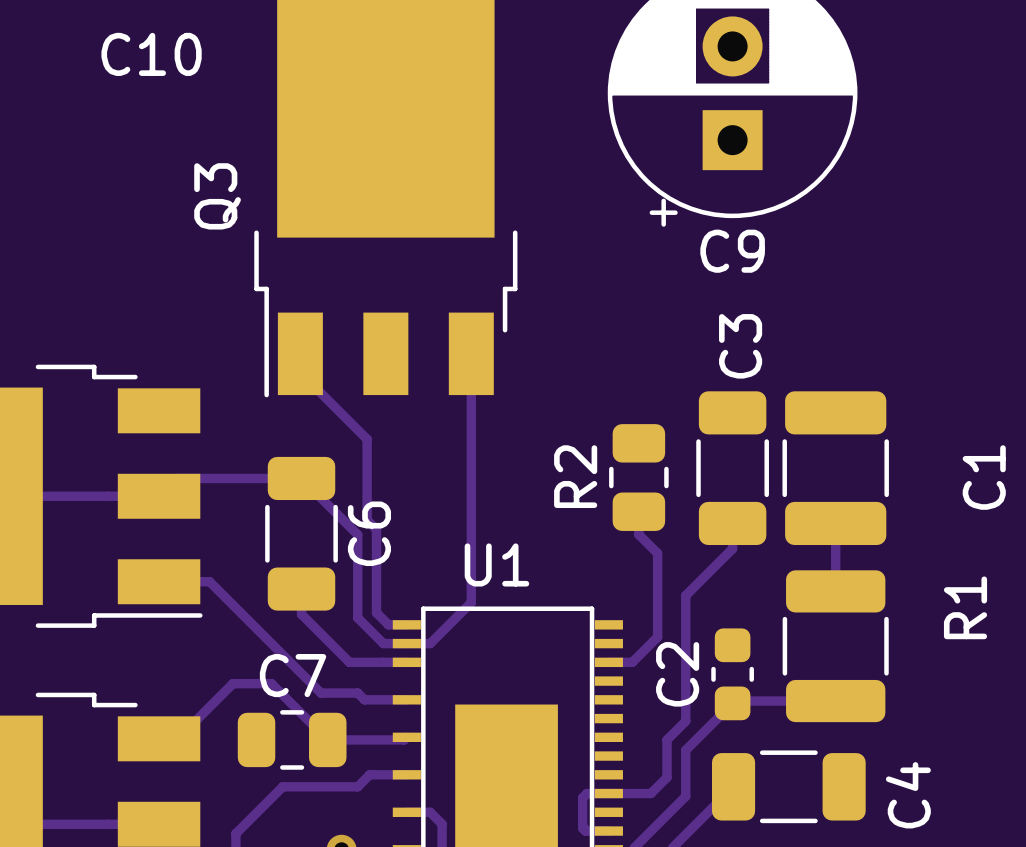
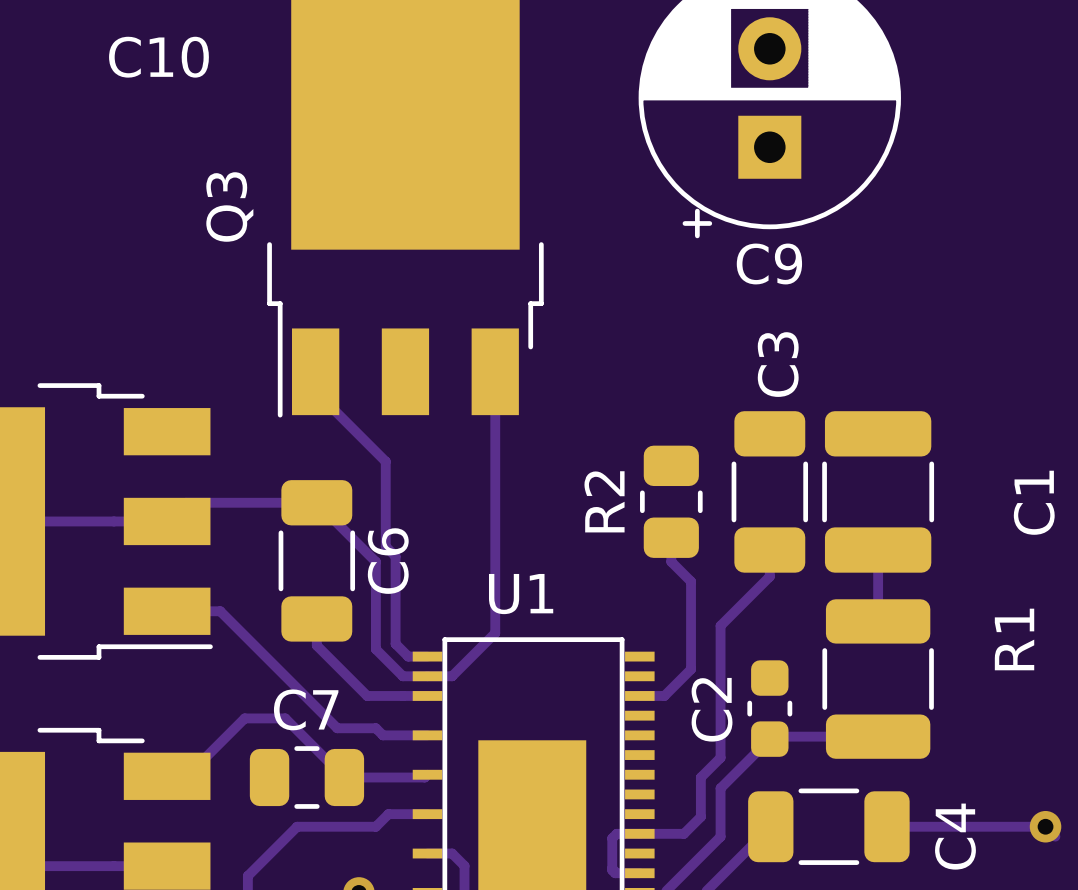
track: none -> (886, 826) (1045, 826) (1055, 836)
via: none -> (1045, 826)

